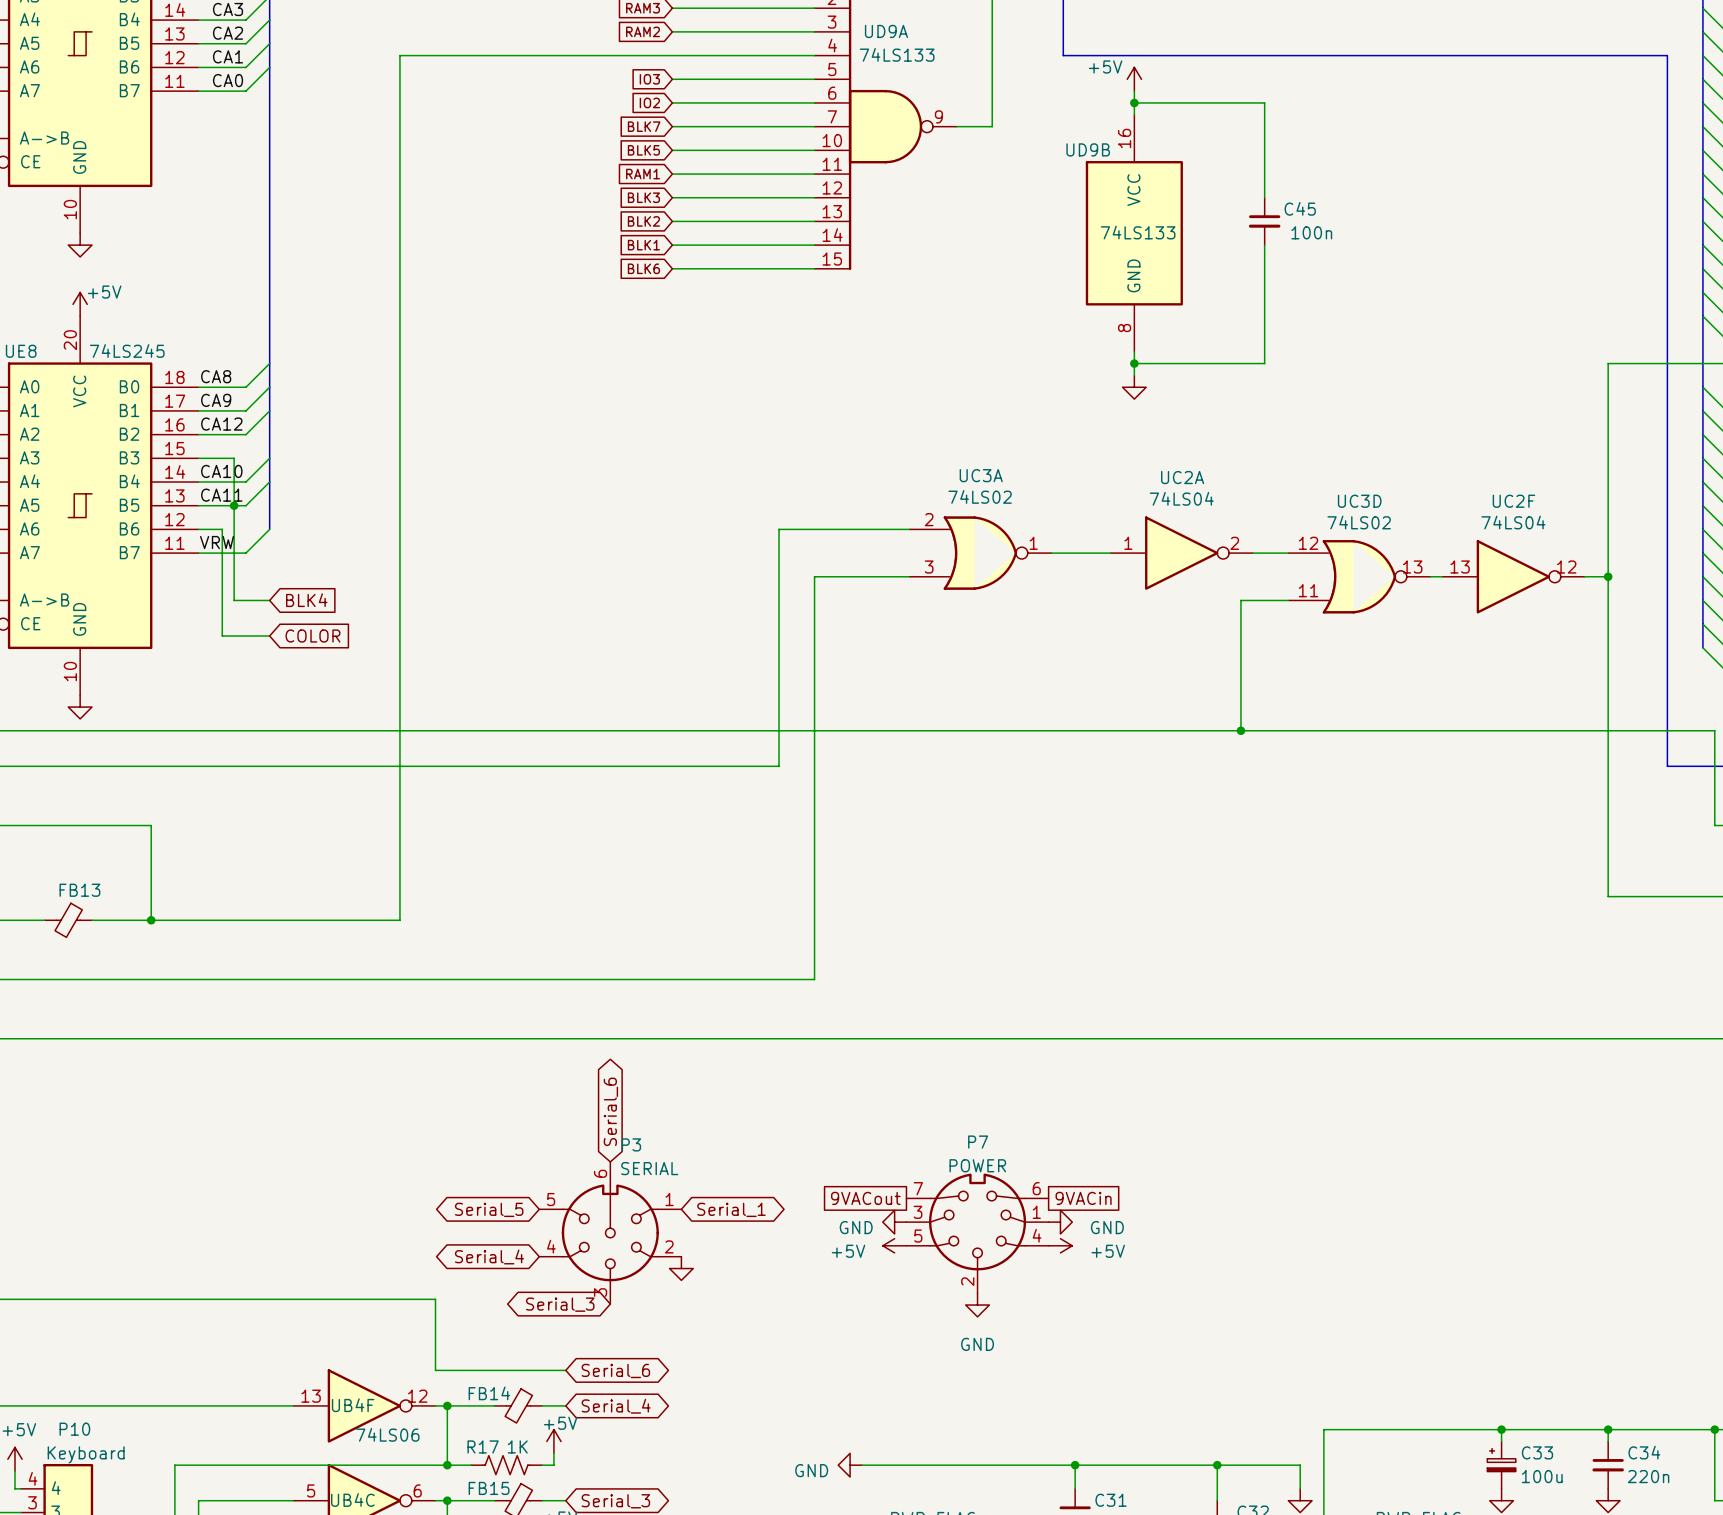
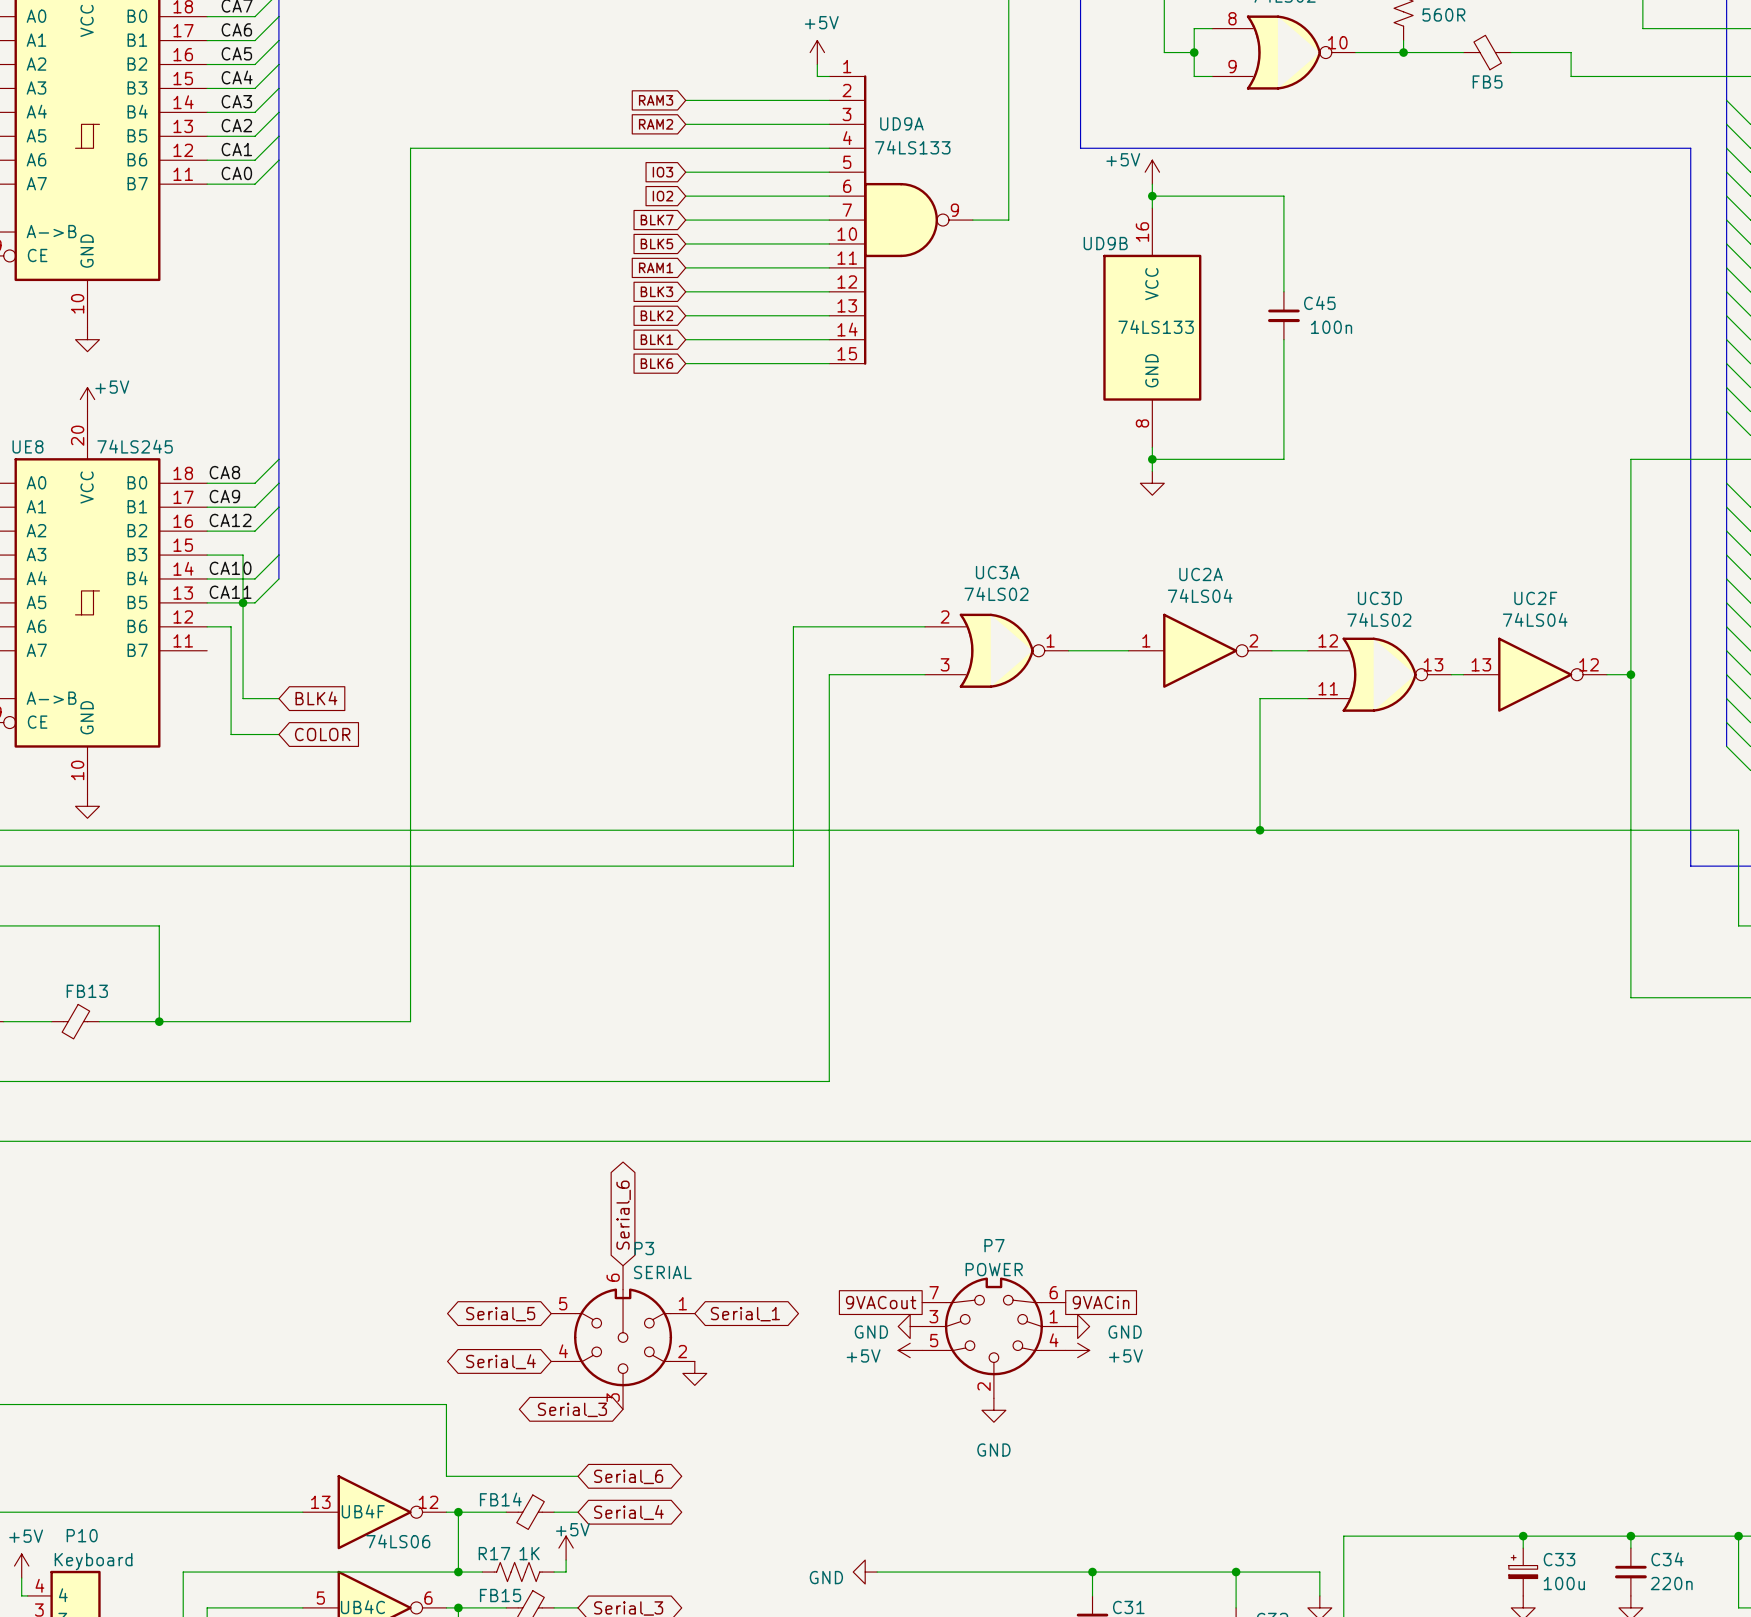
bus: (269, 482) (269, 529) -> none
wire: (269, 529) (245, 553) (198, 553) -> none
label: VRW (217, 542) -> none

